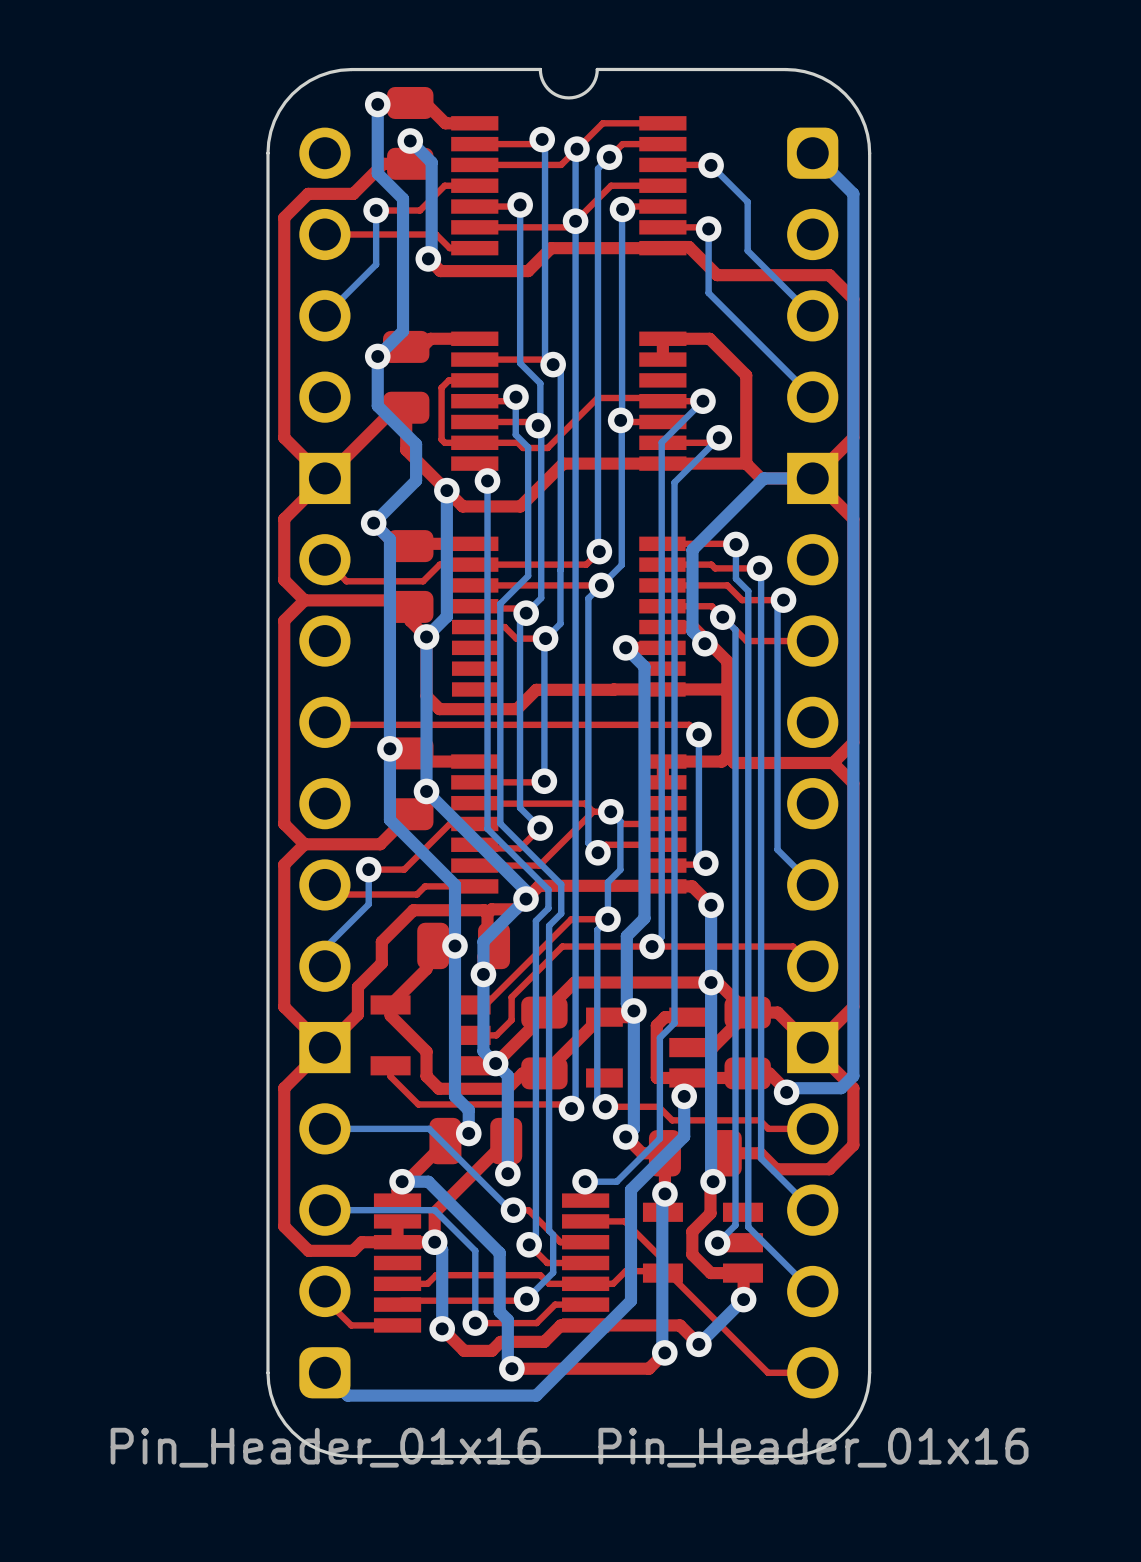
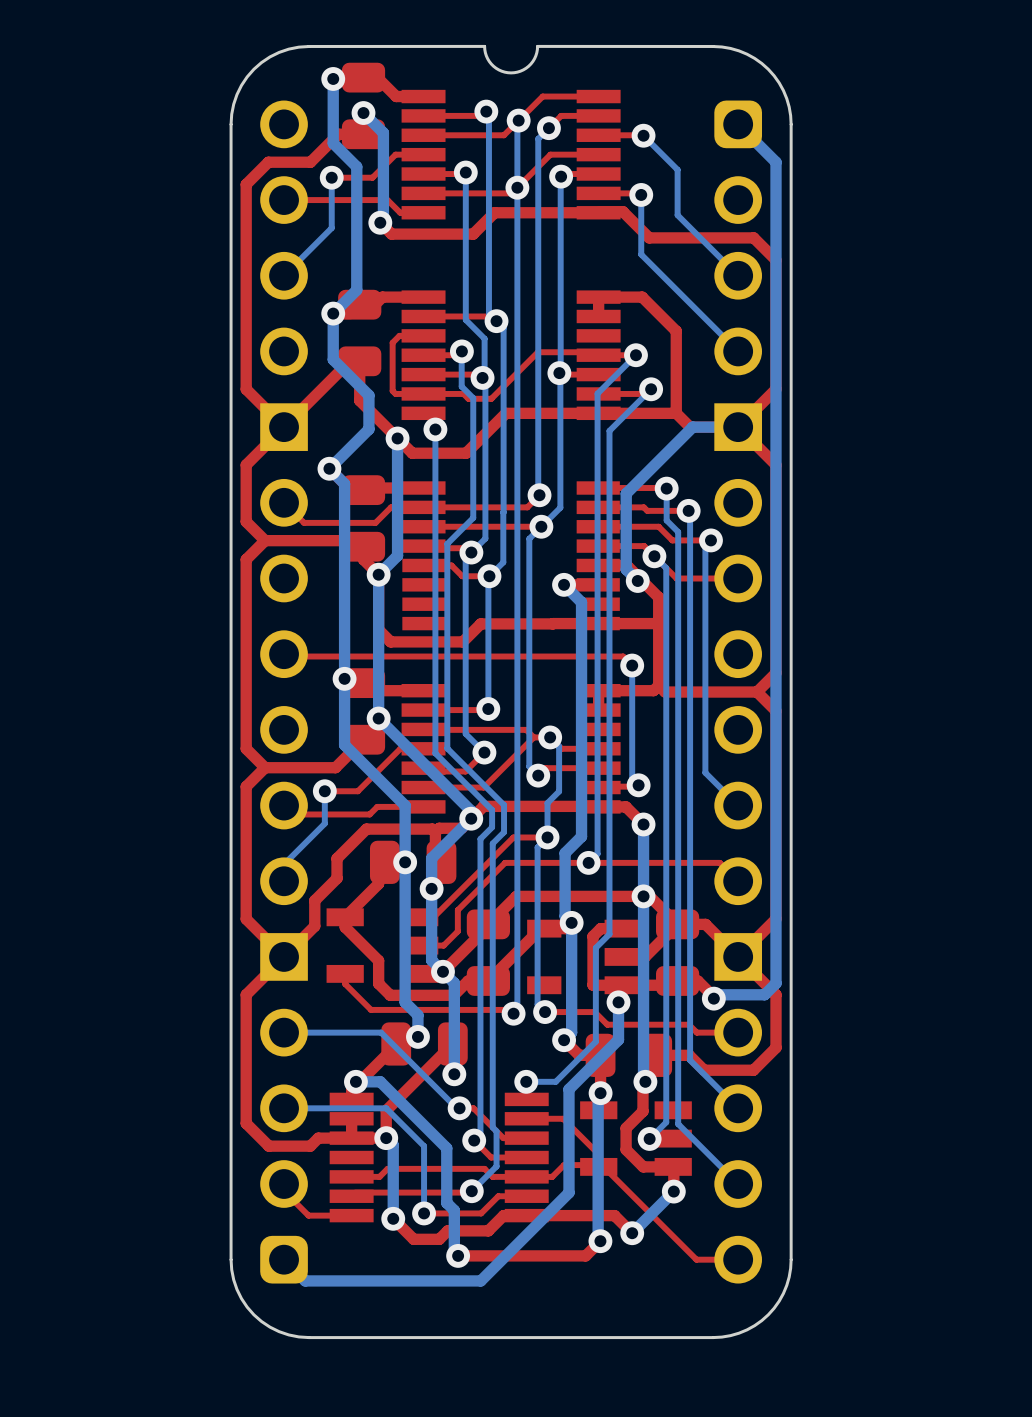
drawing: [110, 1427, 1029, 1468] -> none

